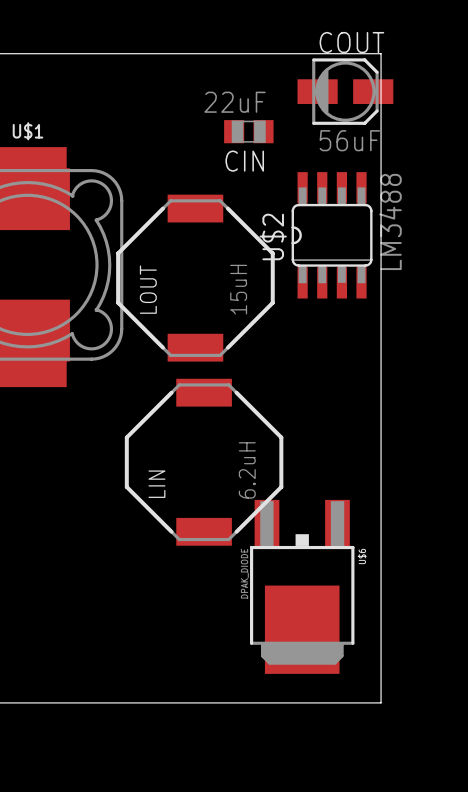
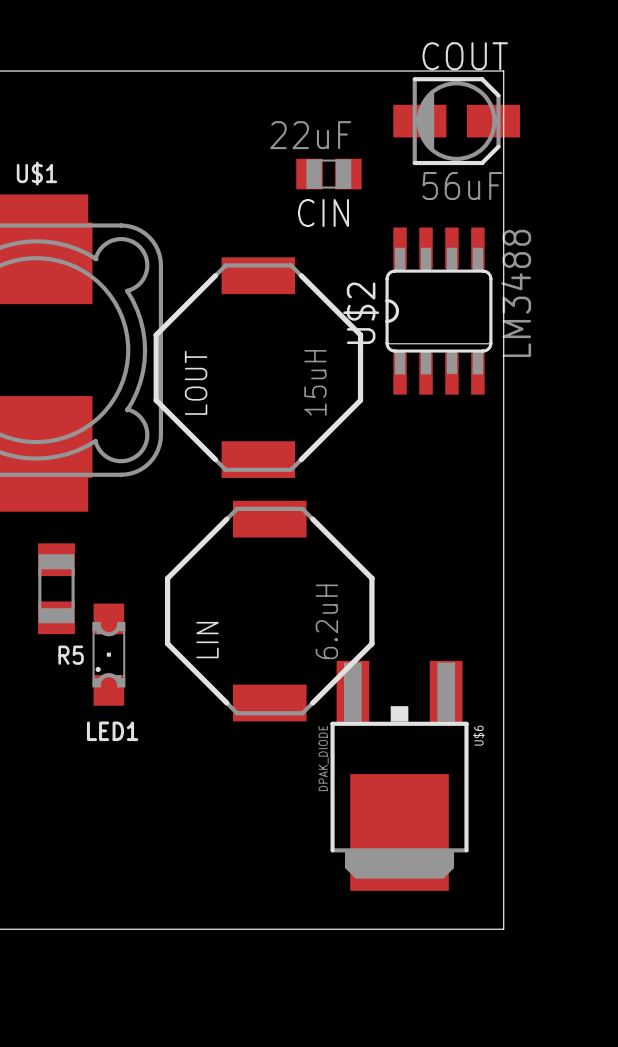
R5: none -> (56, 588)
LED1: none -> (108, 654)

